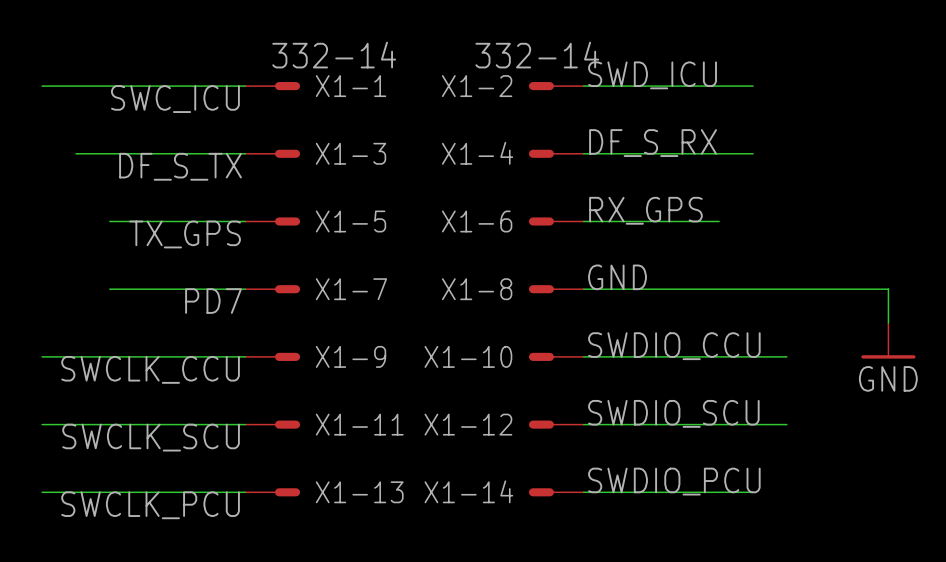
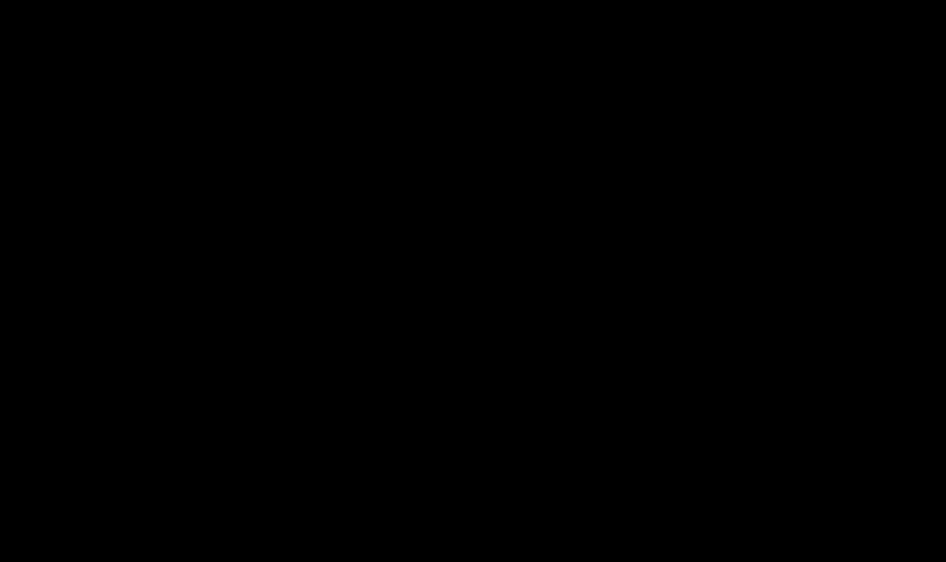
label: SWD_ICU (652, 75) -> none
wire: (42, 86) (245, 86) -> none
X1-1: 332-14 (272, 86) -> none
X1-2: 332-14 (556, 86) -> none
wire: (583, 86) (753, 86) -> none
label: SWC_ICU (175, 99) -> none
label: DF_S_RX (653, 143) -> none
wire: (75, 153) (245, 153) -> none
X1-3: (272, 153) -> none
X1-4: (556, 153) -> none
wire: (583, 153) (753, 153) -> none
label: DF_S_TX (180, 166) -> none
label: RX_GPS (645, 210) -> none
wire: (109, 221) (245, 221) -> none
X1-5: (272, 221) -> none
X1-6: (556, 221) -> none
wire: (583, 221) (719, 221) -> none
label: TX_GPS (185, 234) -> none
label: GND (617, 277) -> none
wire: (109, 289) (245, 289) -> none
X1-7: (272, 289) -> none
X1-8: (556, 289) -> none
wire: (583, 289) (888, 289) (888, 323) -> none
label: PD7 (213, 301) -> none
power symbol: GND (888, 340) -> none
label: SWDIO_CCU (674, 346) -> none
wire: (42, 356) (245, 356) -> none
X1-9: (272, 356) -> none
X1-10: (556, 356) -> none
wire: (583, 356) (786, 356) -> none
label: SWCLK_CCU (150, 369) -> none
label: SWDIO_SCU (673, 413) -> none
wire: (42, 424) (245, 424) -> none
X1-11: (272, 424) -> none
X1-12: (556, 424) -> none
wire: (583, 424) (786, 424) -> none
label: SWCLK_SCU (151, 437) -> none
label: SWDIO_PCU (674, 481) -> none
wire: (42, 492) (245, 492) -> none
X1-13: (272, 492) -> none
X1-14: (556, 492) -> none
wire: (583, 492) (753, 492) -> none
label: SWCLK_PCU (150, 505) -> none

